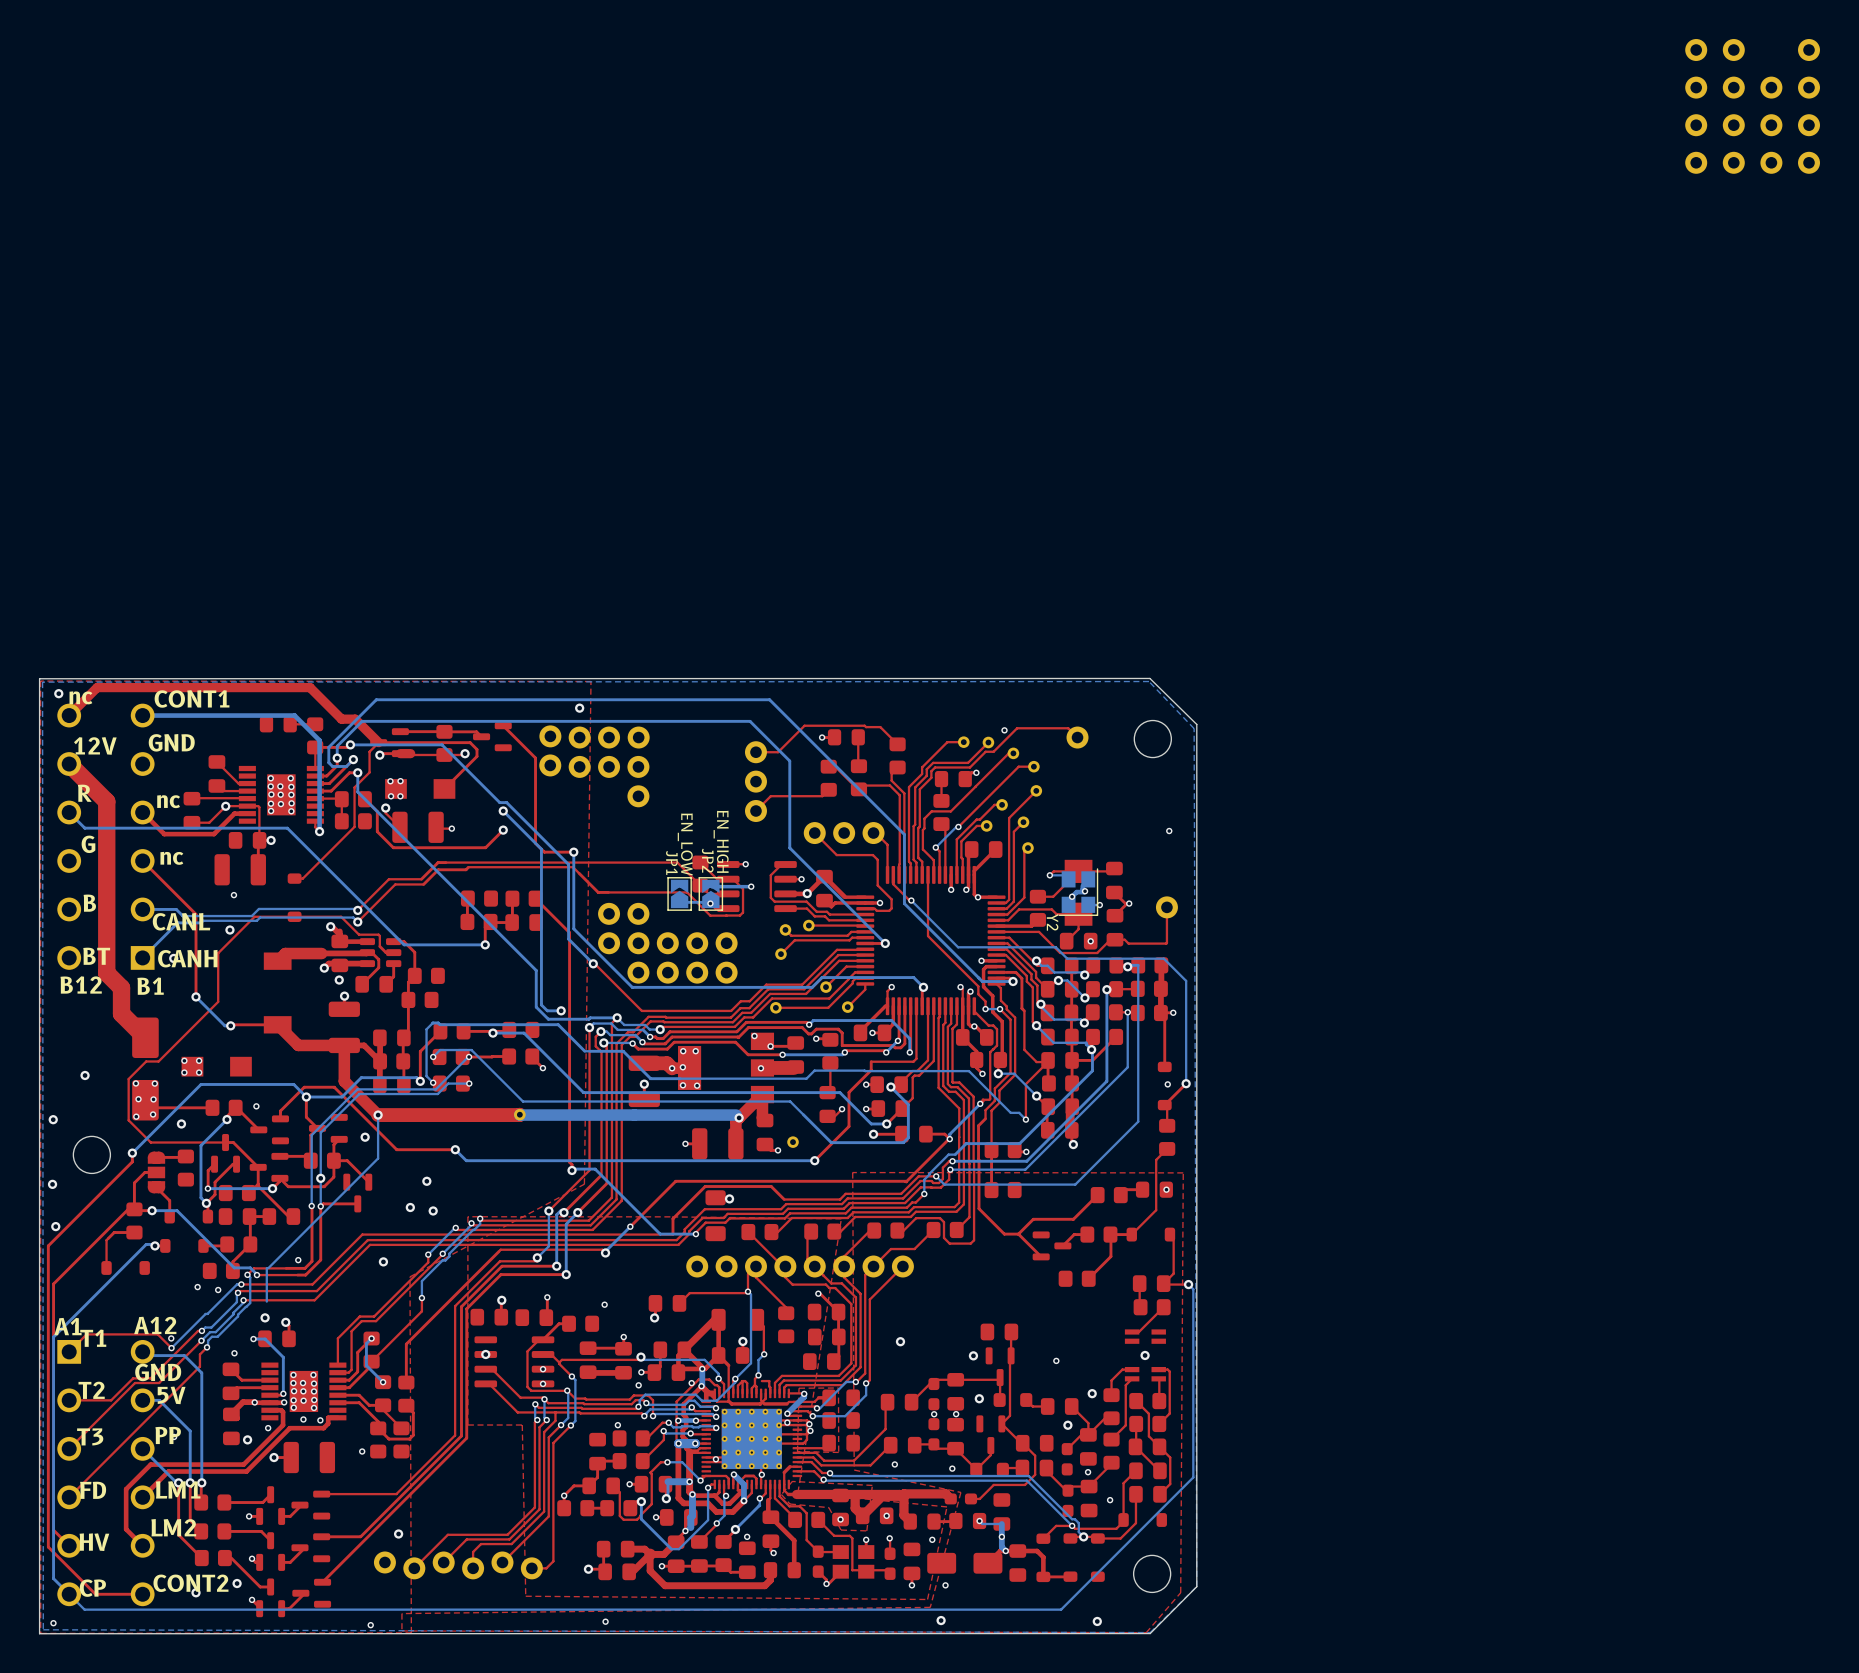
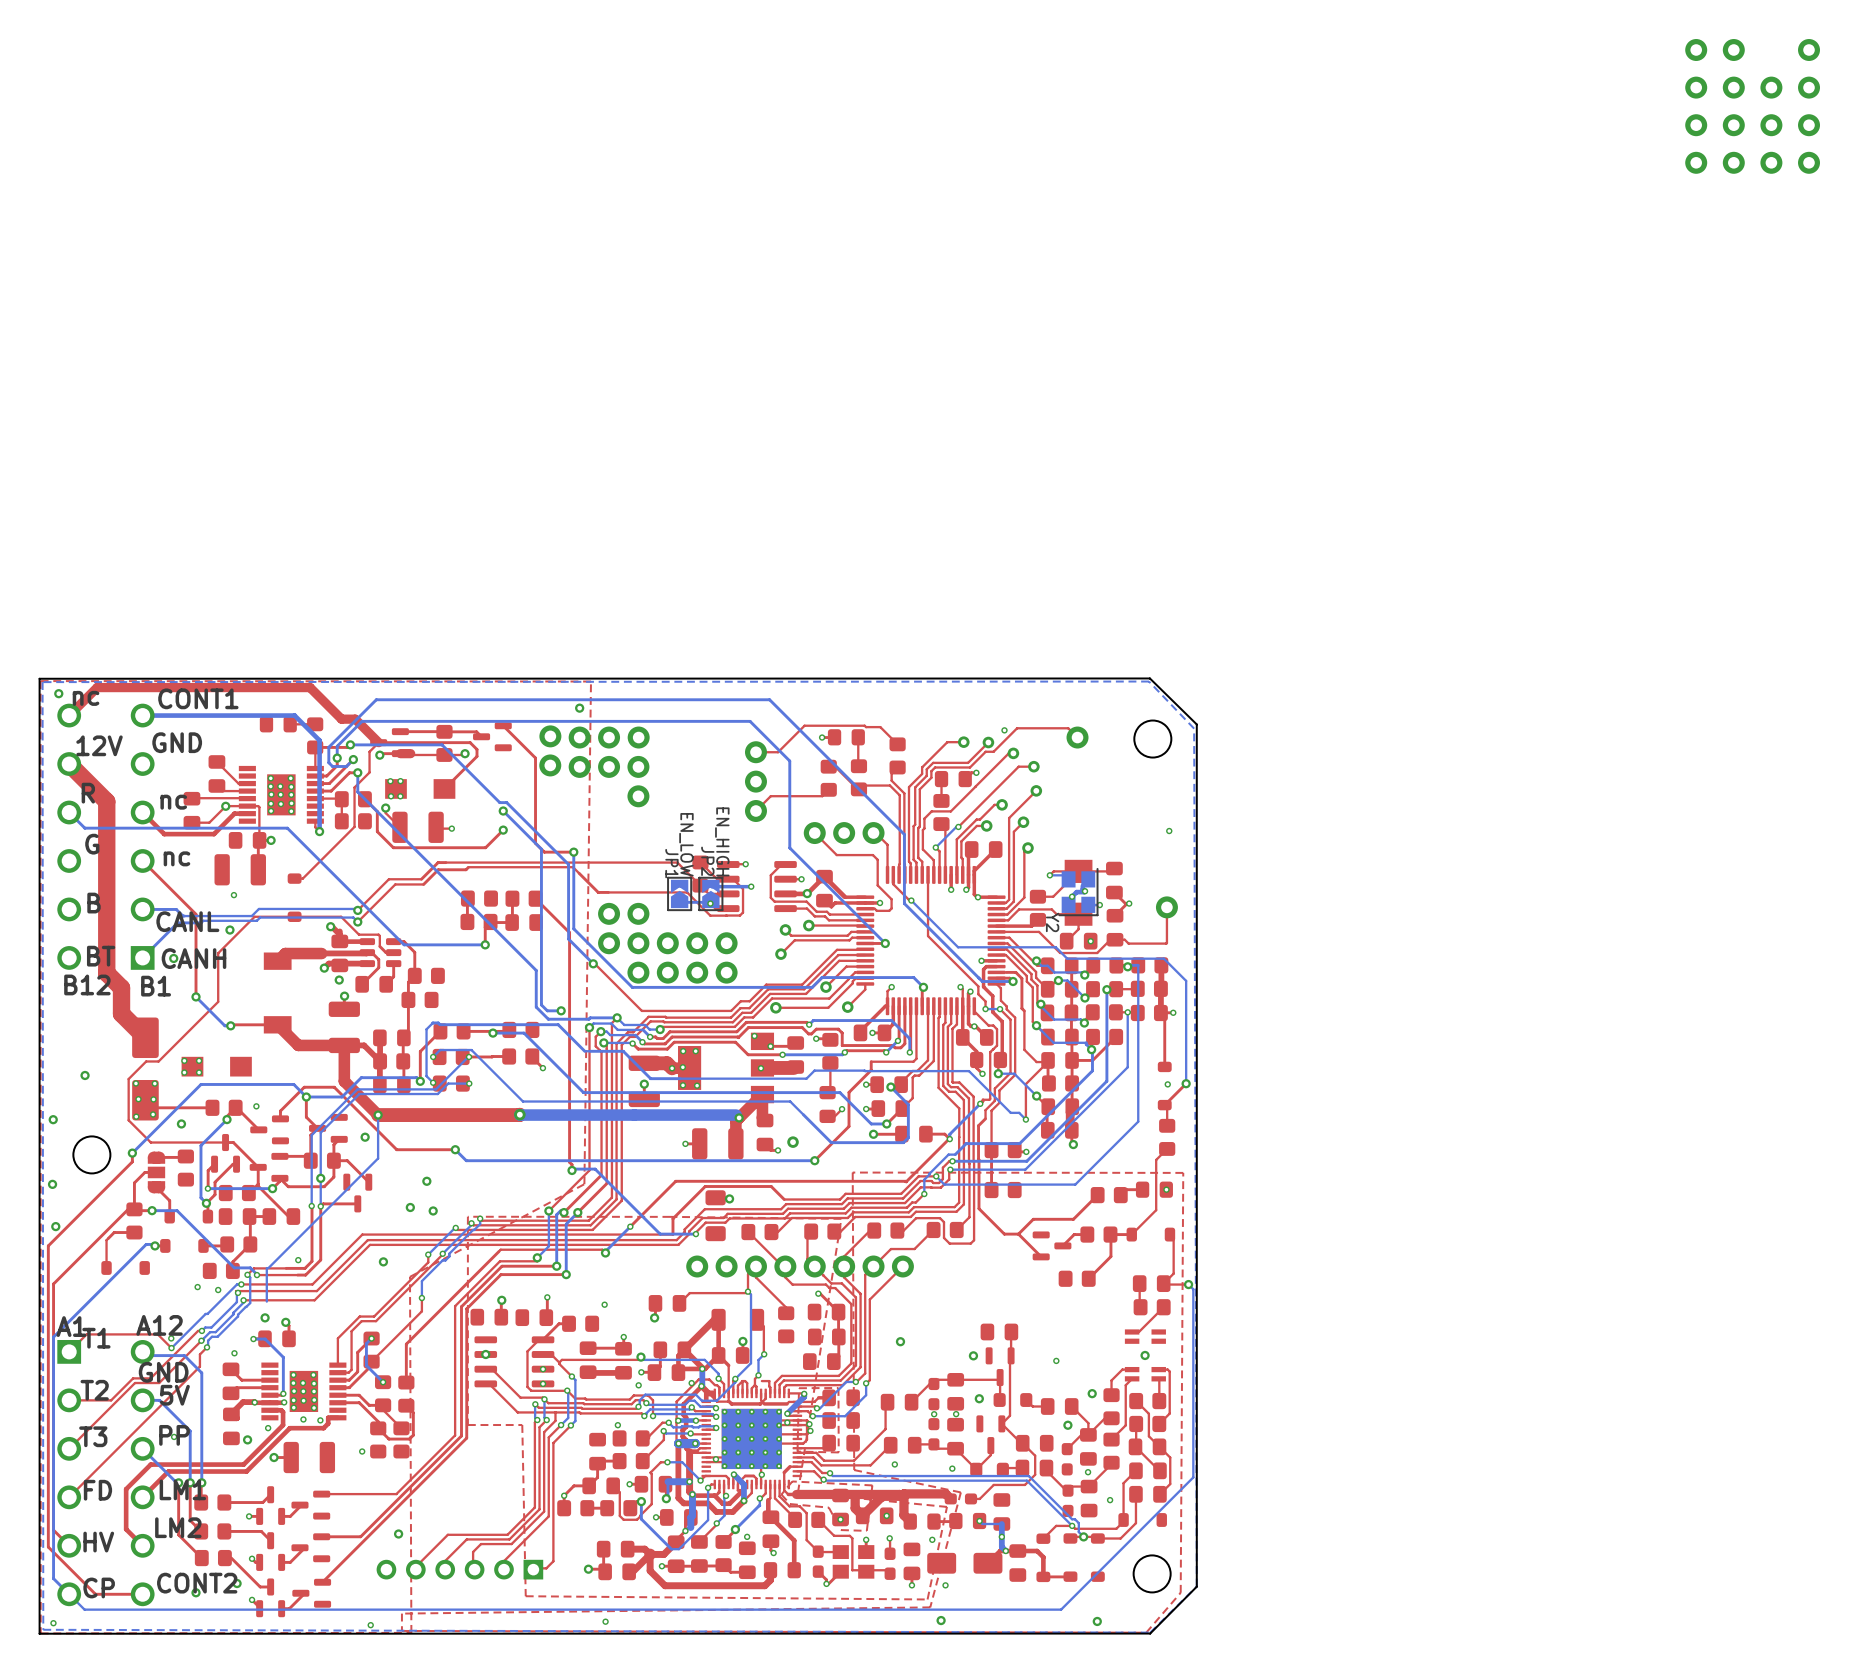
part: (384, 1562) -> none
part: (443, 1562) -> none
part: (502, 1562) -> none
part: (414, 1568) -> none
part: (473, 1568) -> none
part: (531, 1568) -> none
part: none -> (459, 1569)

